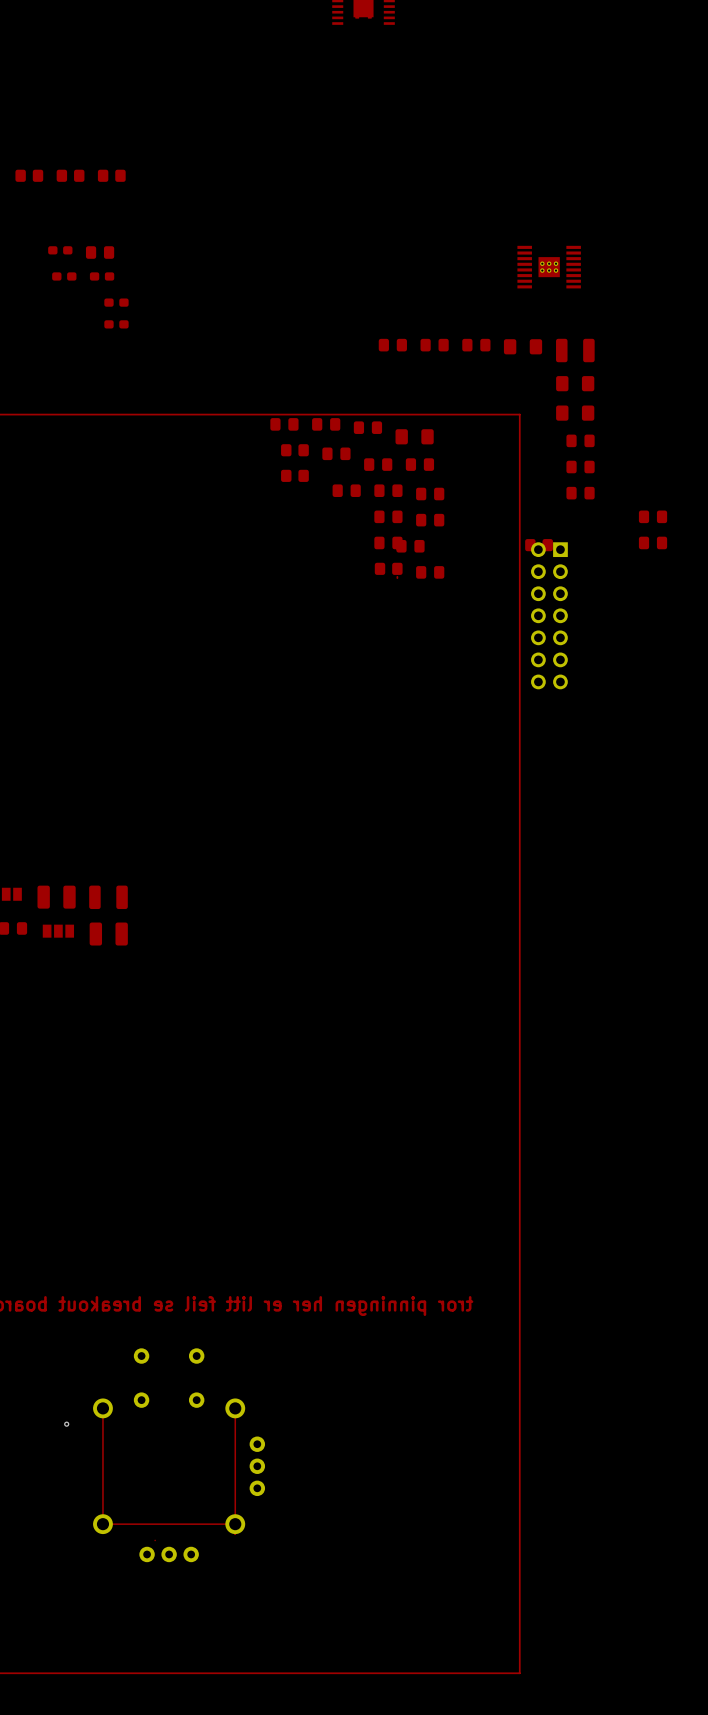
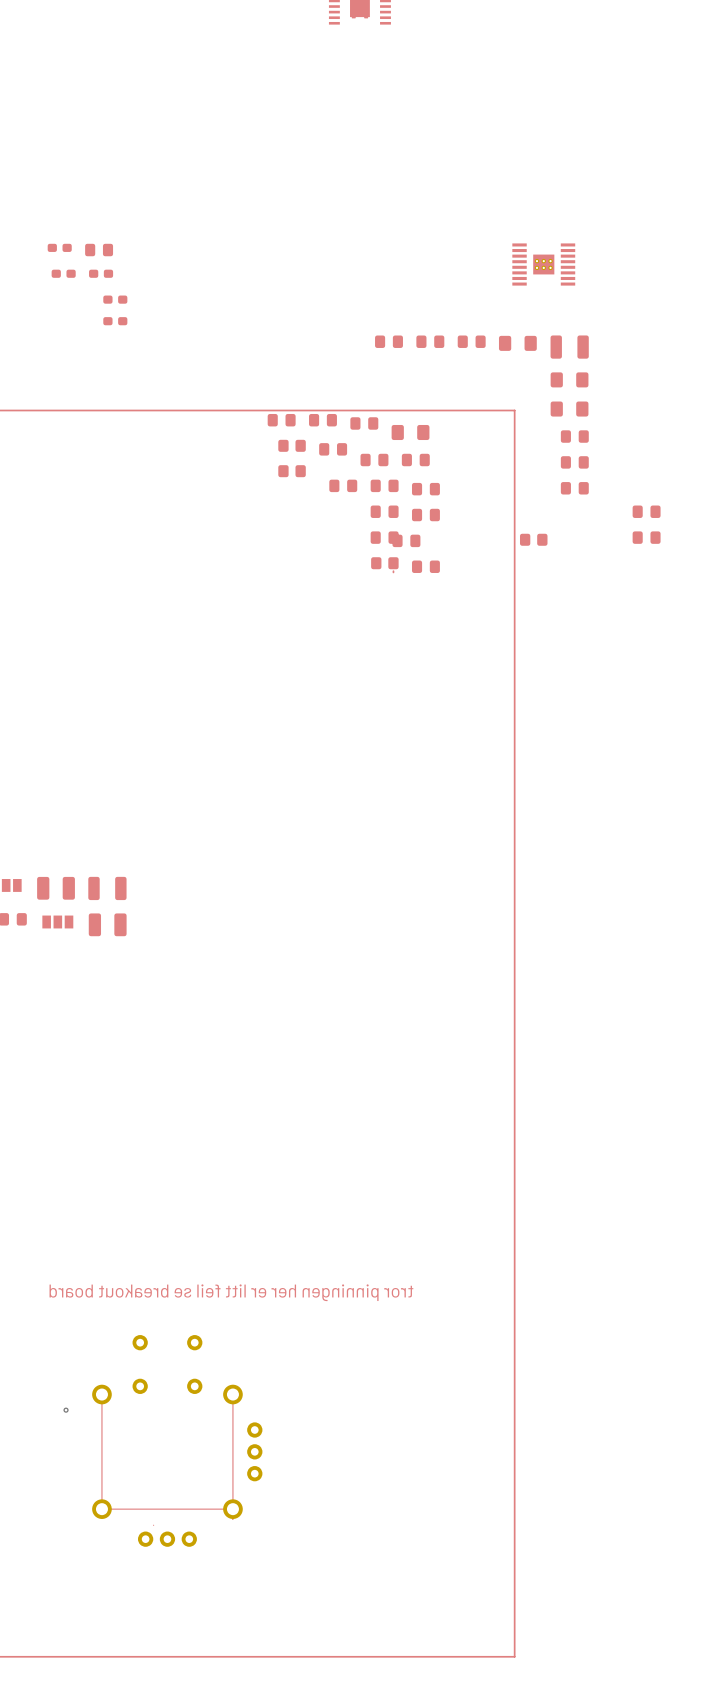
part: (29, 175) -> none
part: (70, 175) -> none
part: (111, 175) -> none
part: (549, 615) -> none

